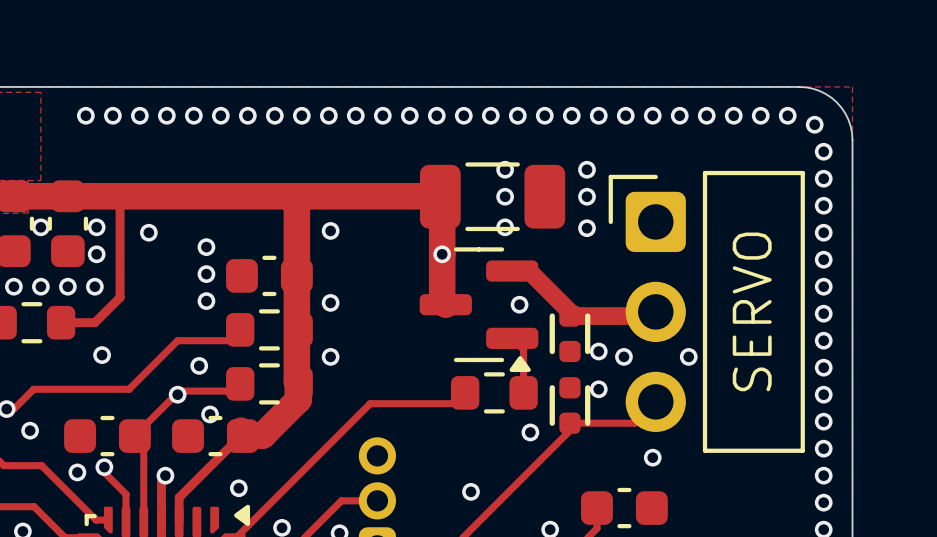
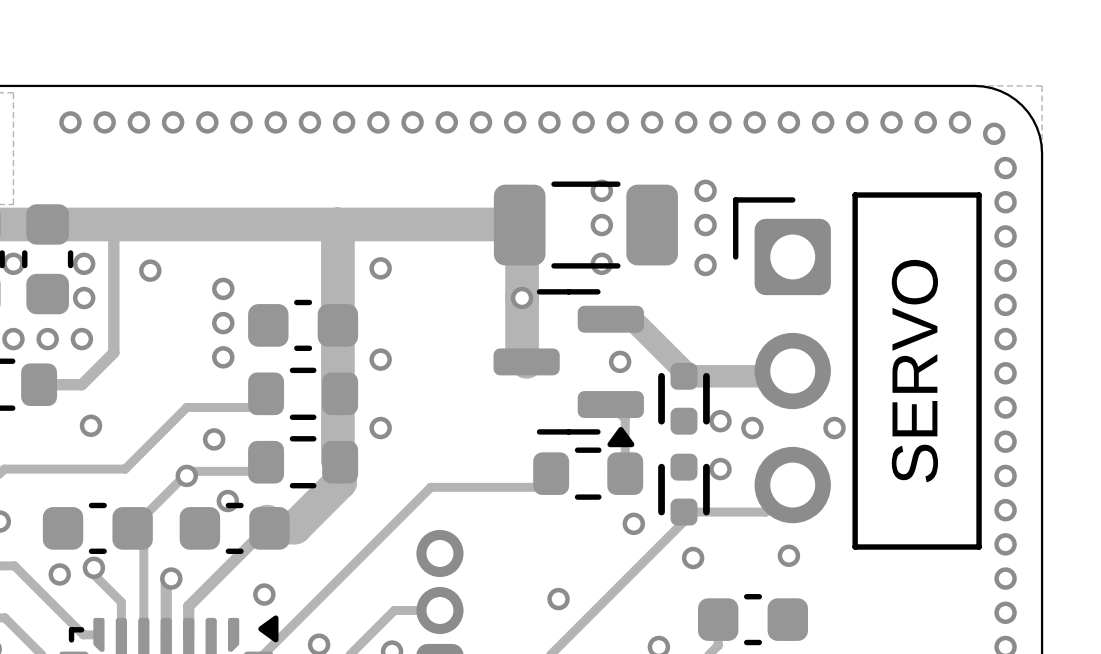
via: none -> (693, 558)

